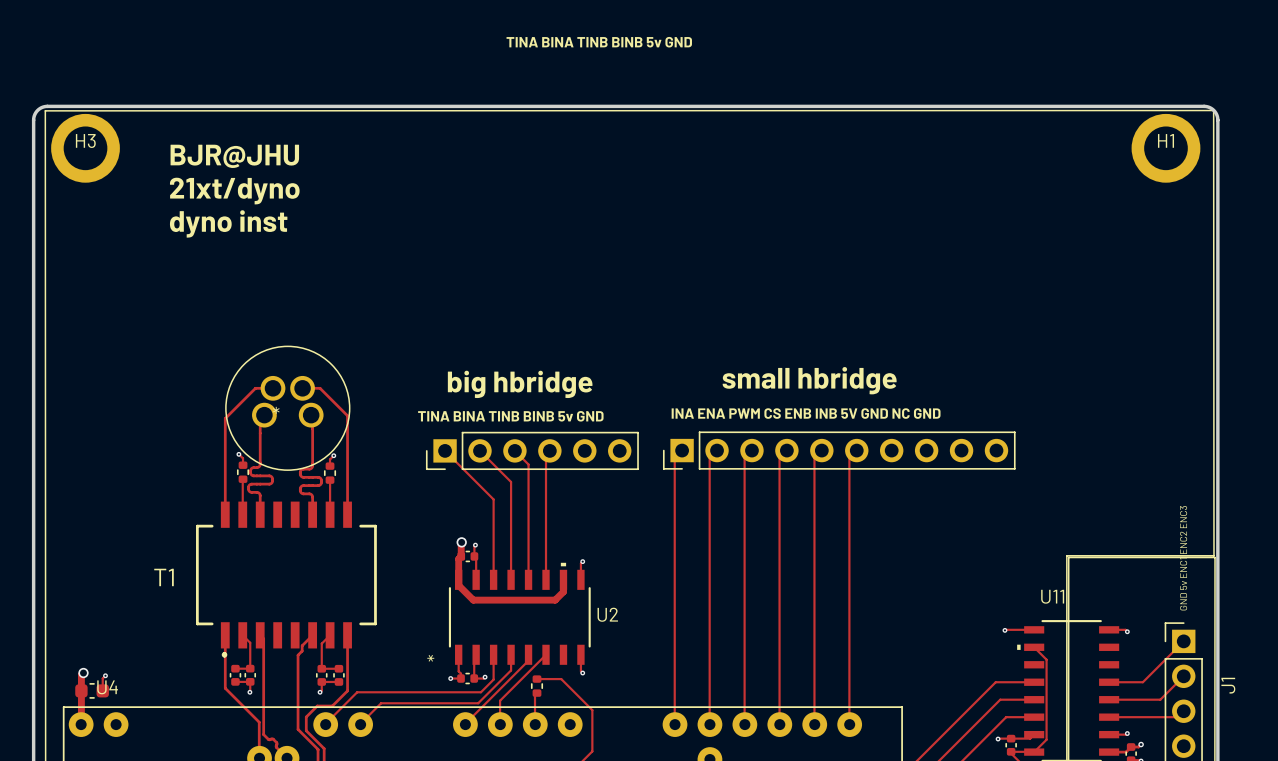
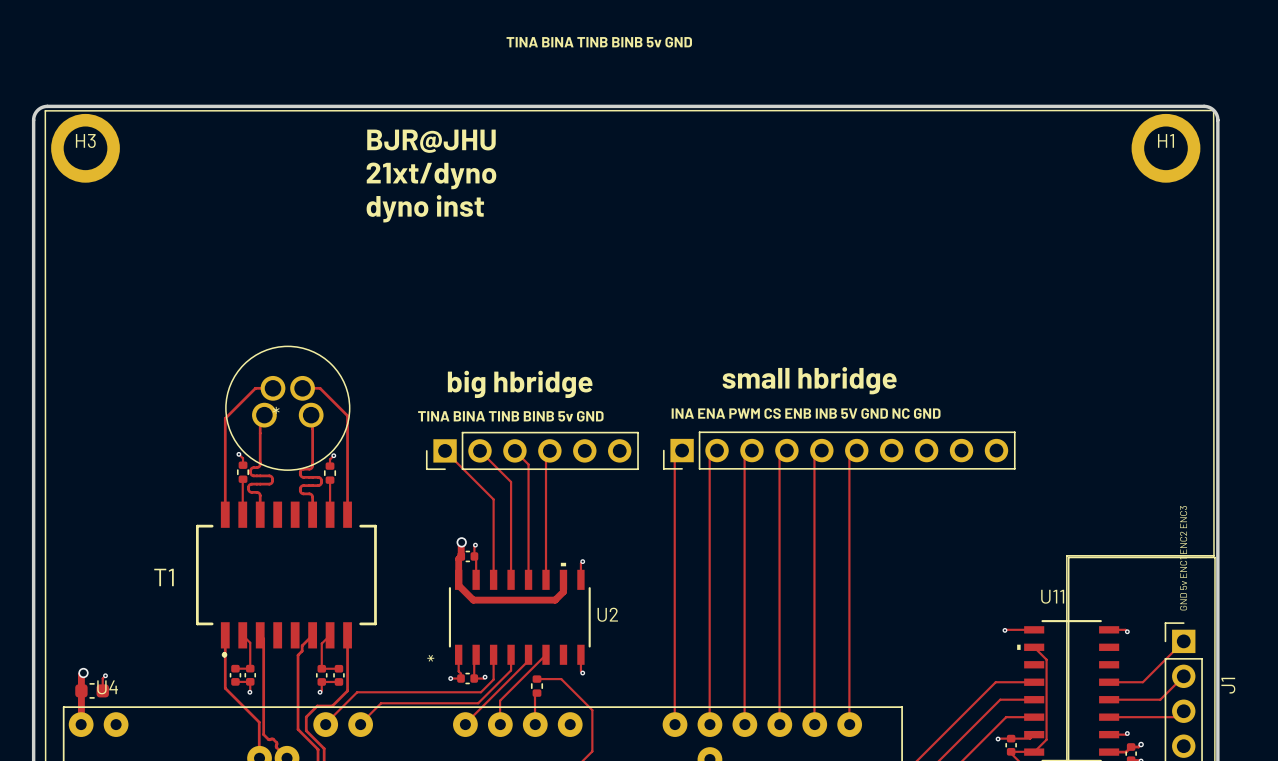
text position: BJR@JHU (234, 156) -> BJR@JHU (431, 141)
text position: 21xt/dyno (234, 191) -> 21xt/dyno (431, 175)
text position: dyno inst (228, 223) -> dyno inst (425, 208)

